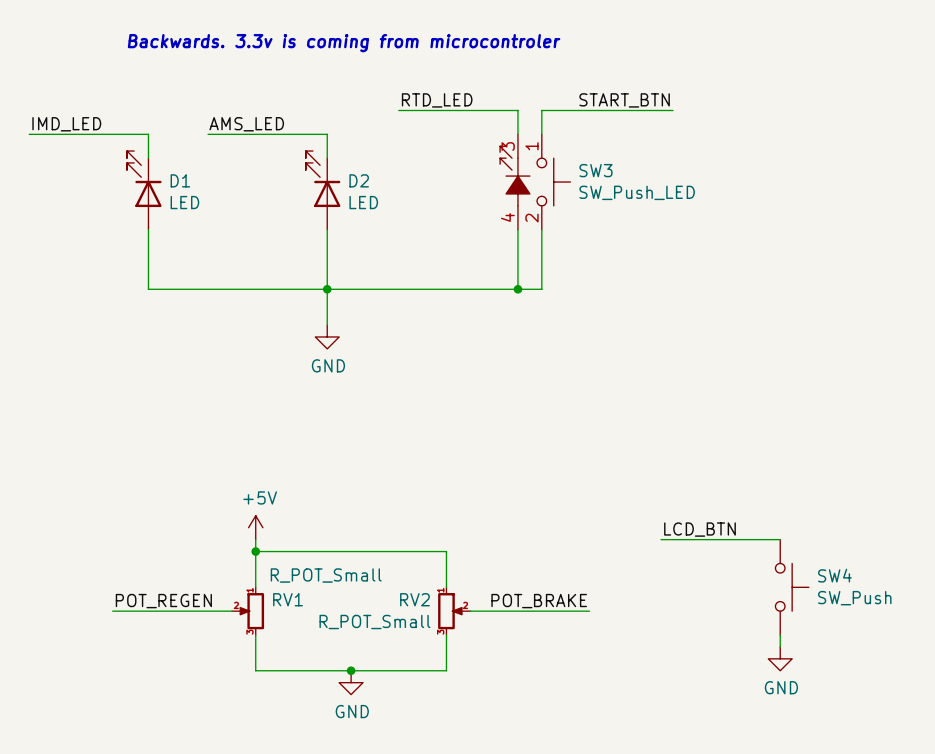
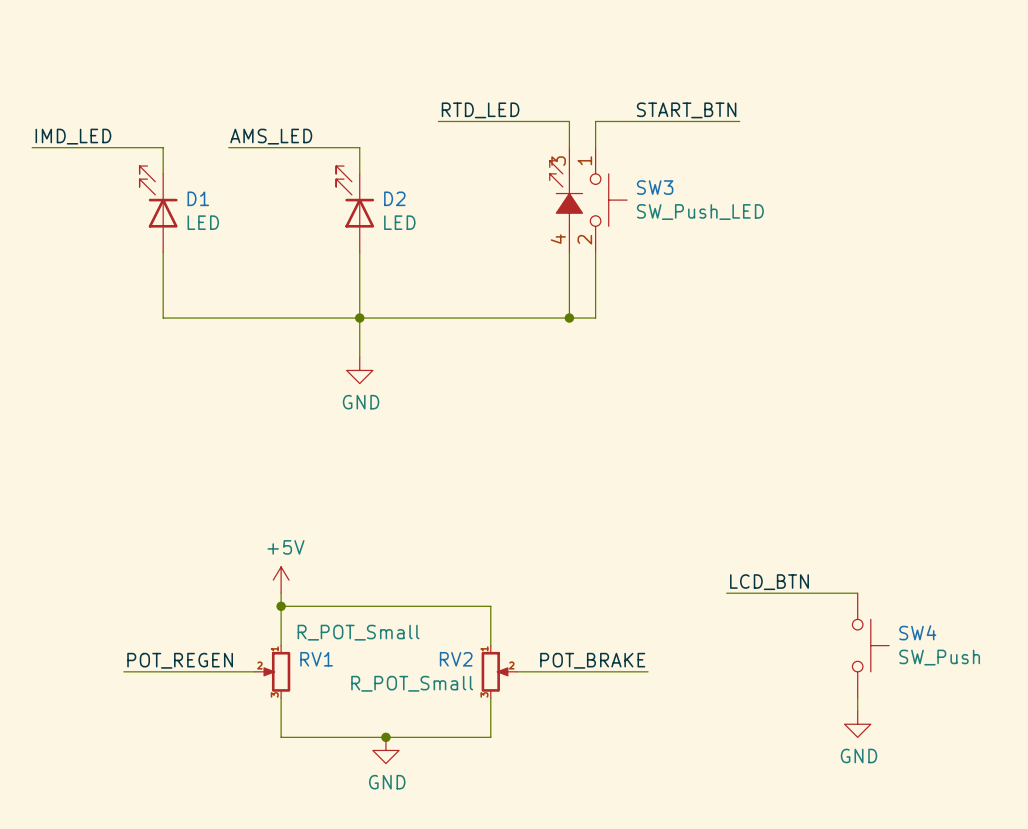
text: Backwards. 3.3v is coming from microcontroler (344, 43) -> none

